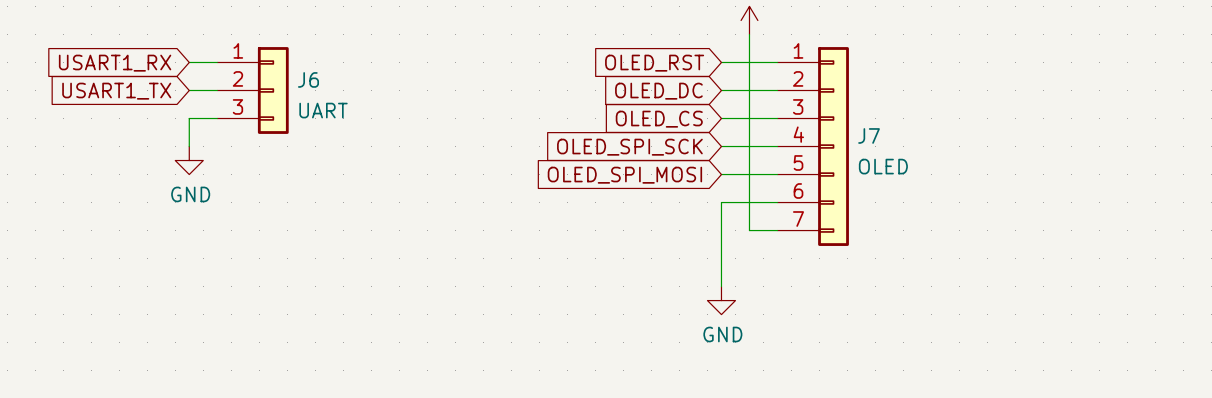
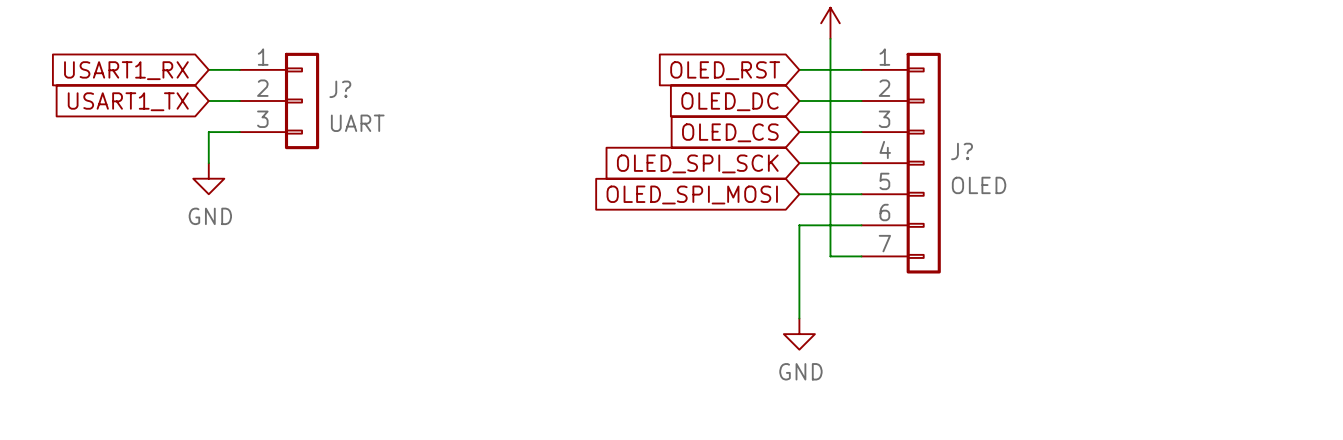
J6 name: J6 (308, 79) -> J? (340, 89)
J7 name: J7 (869, 135) -> J? (962, 151)

